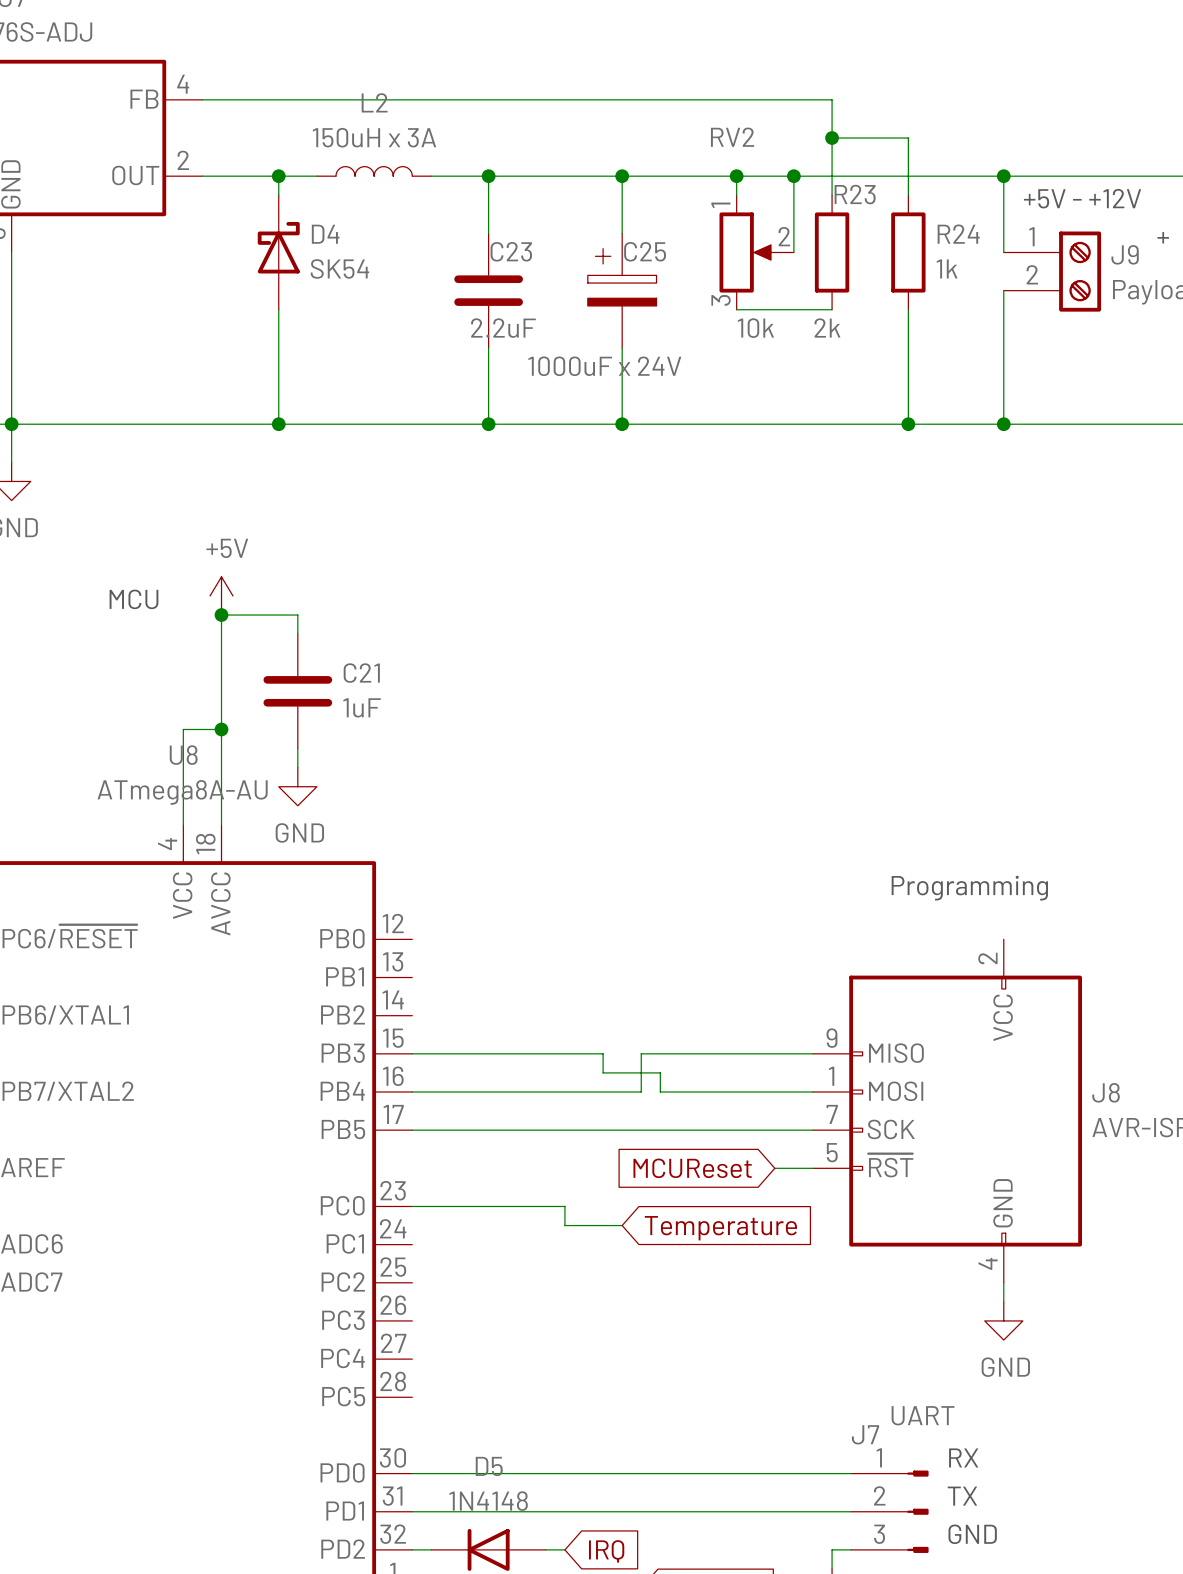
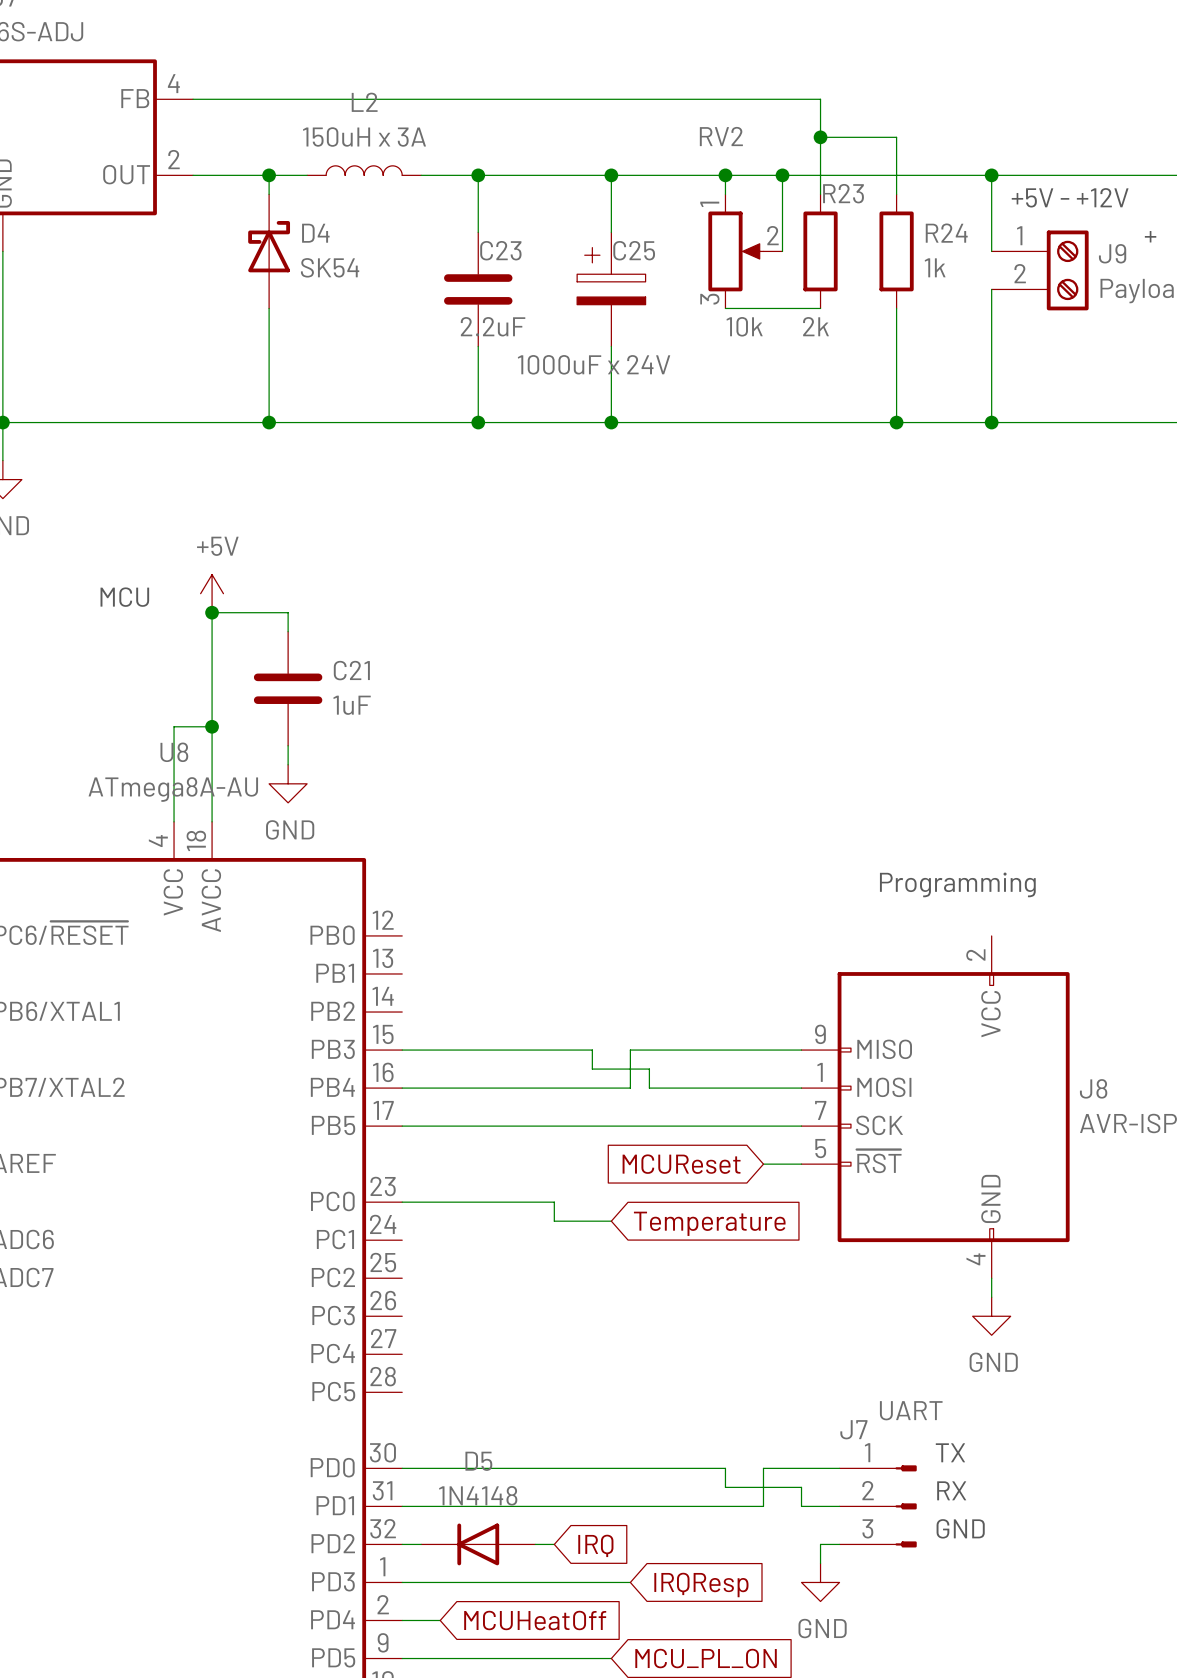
text: RX (963, 1457) -> TX (950, 1452)
wire: (736, 1473) (774, 1473) -> (763, 1506) (763, 1468)
text: TX (962, 1496) -> RX (951, 1490)
wire: (774, 1511) (812, 1511) -> (725, 1468) (725, 1487) (801, 1487) (801, 1506)

